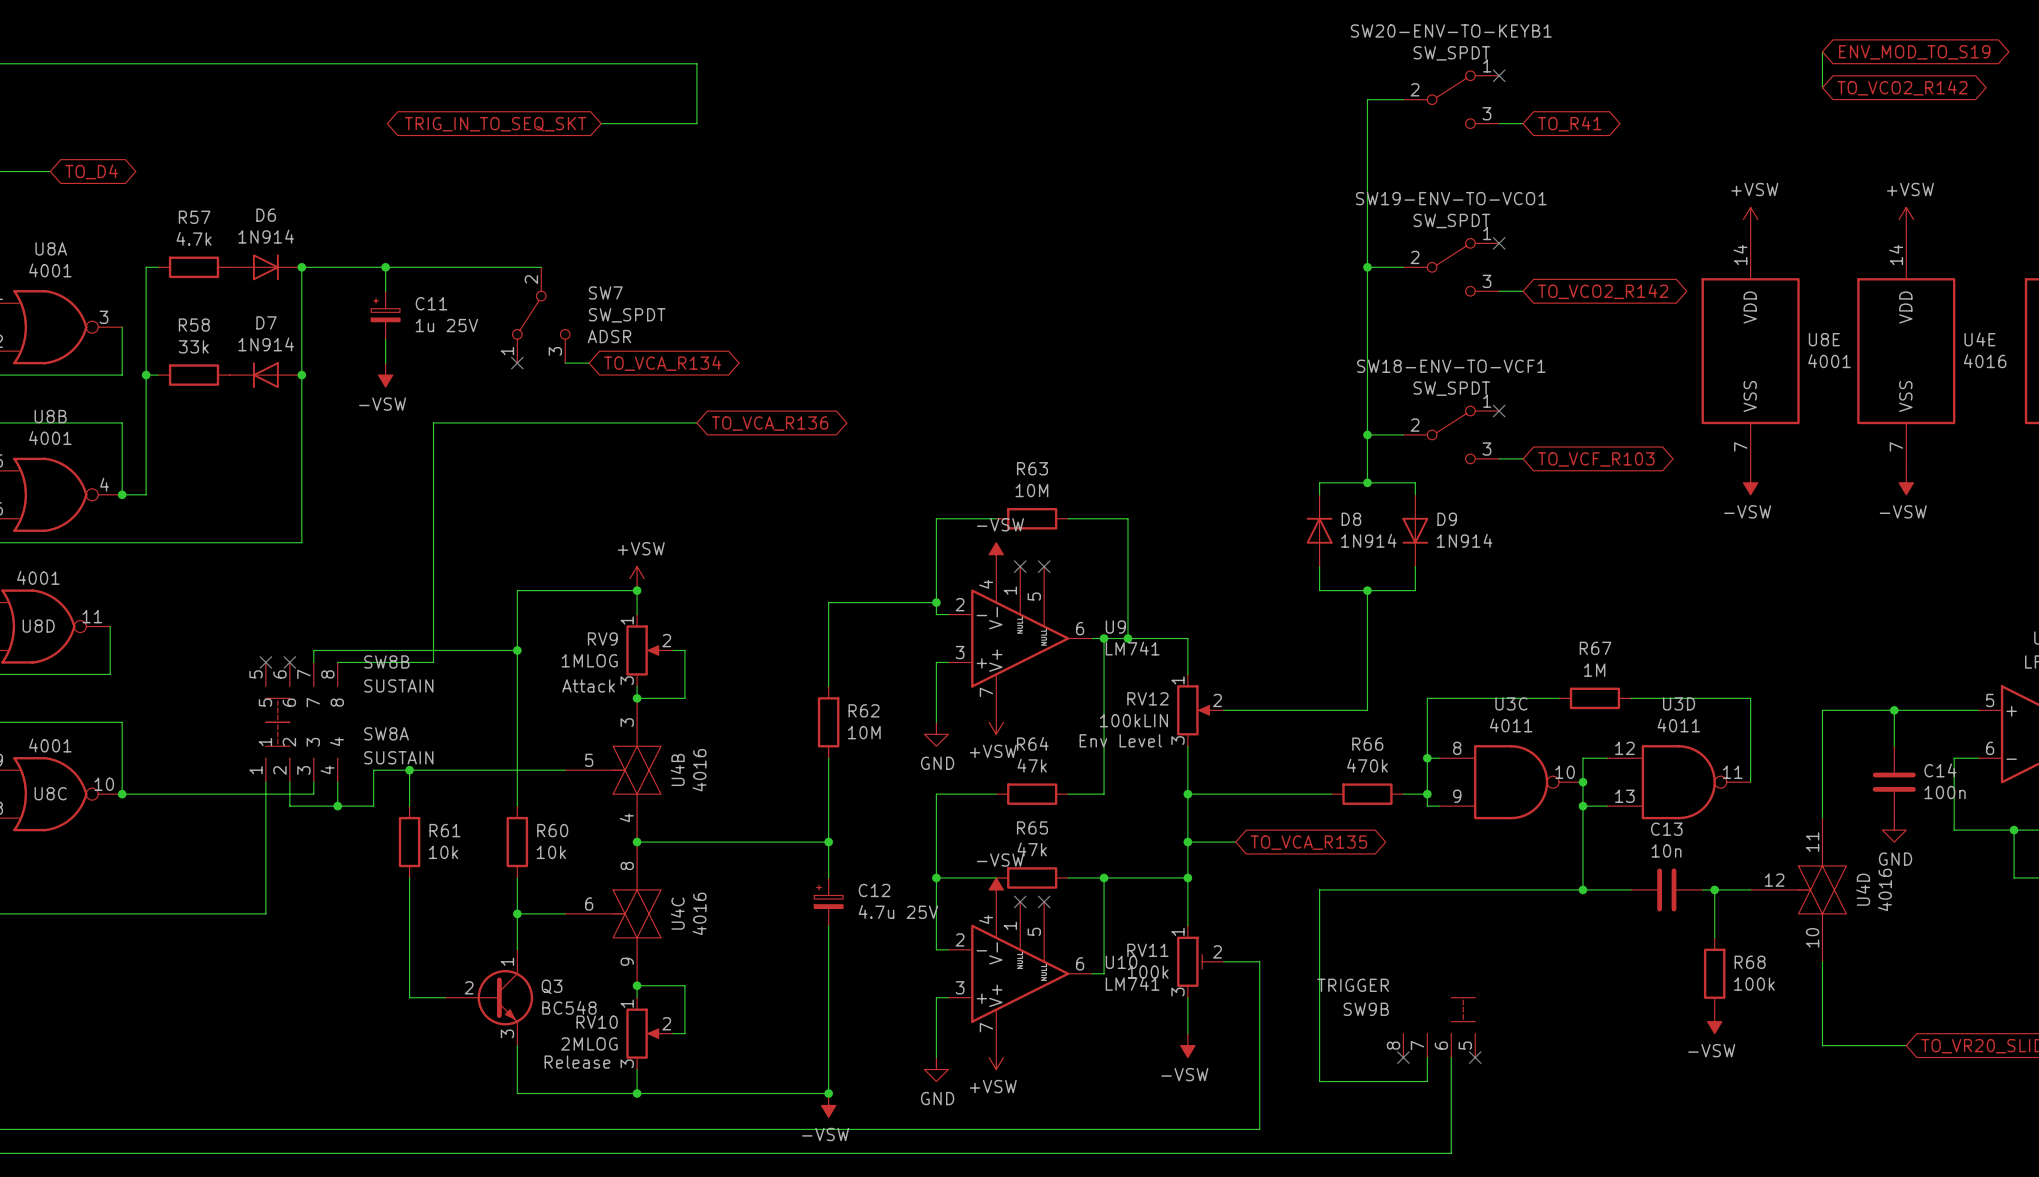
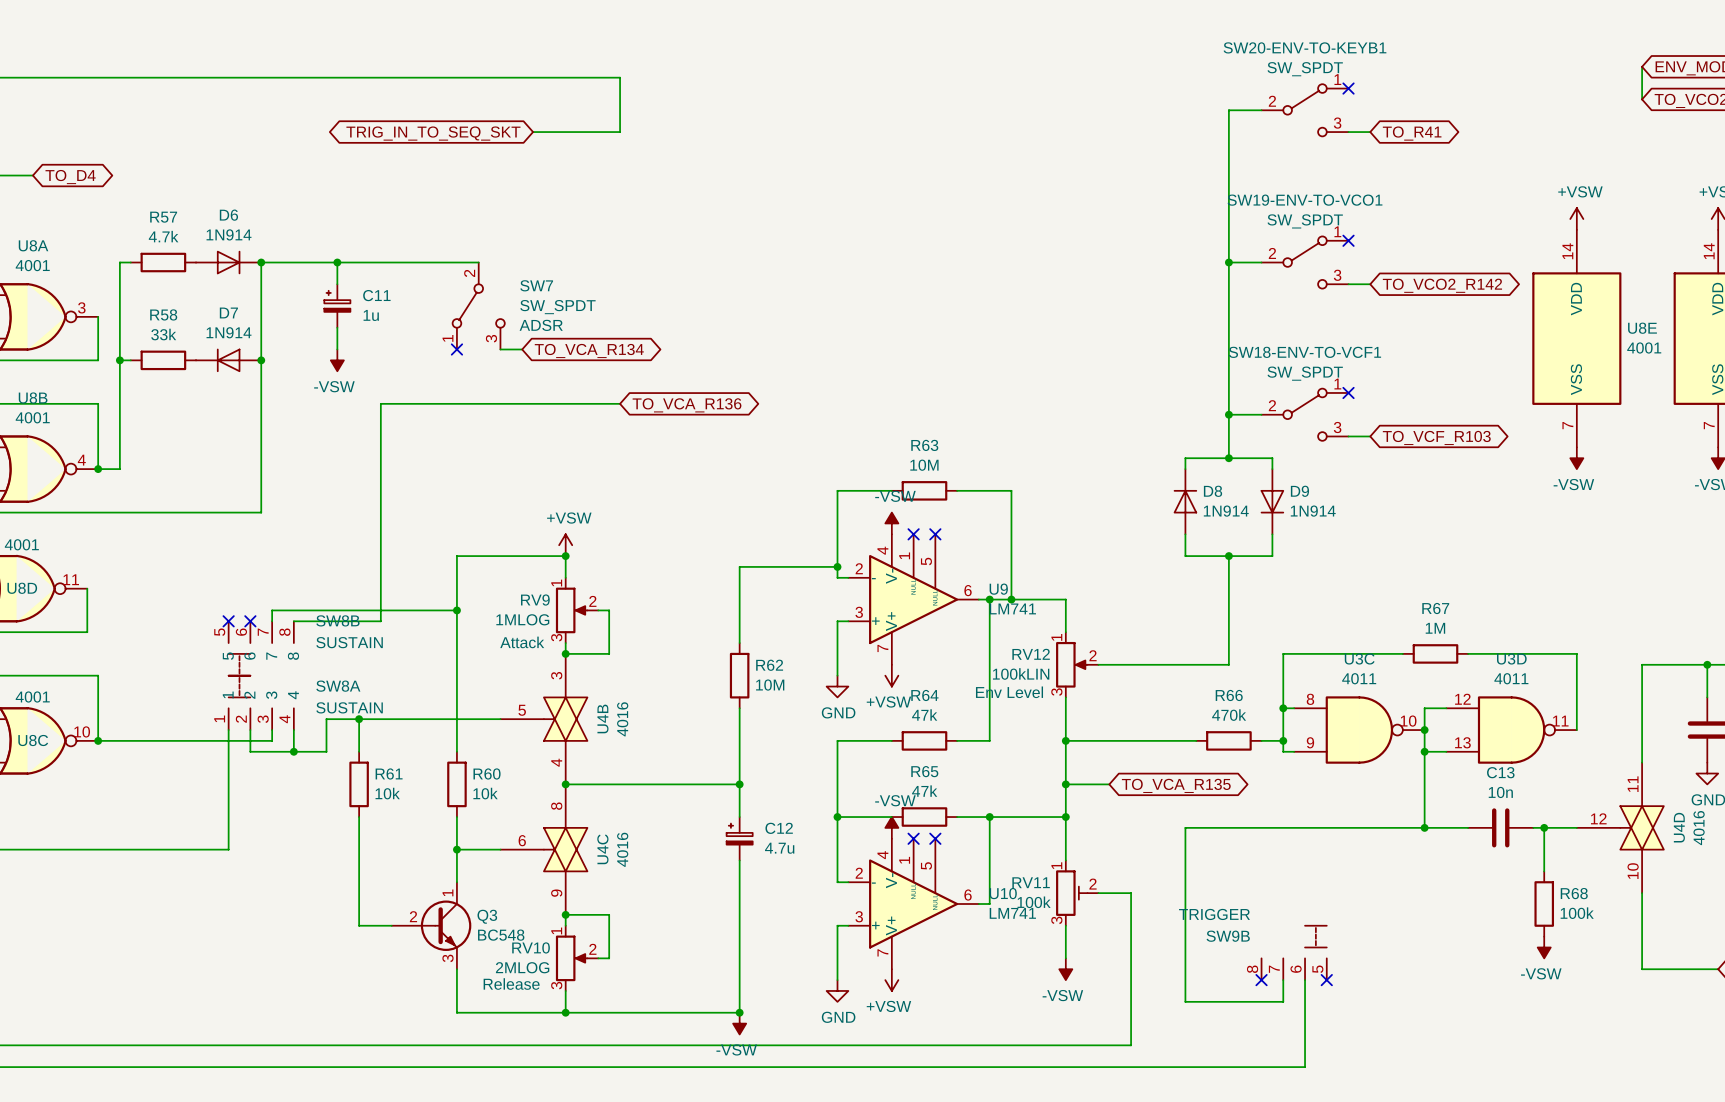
C11 value: 1u 25V (446, 325) -> 1u (371, 315)
C12 value: 4.7u 25V (898, 911) -> 4.7u (779, 848)

